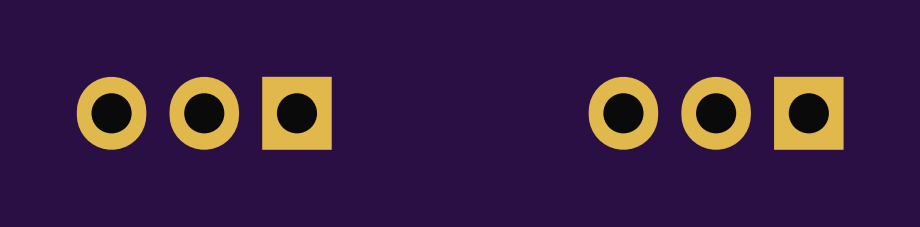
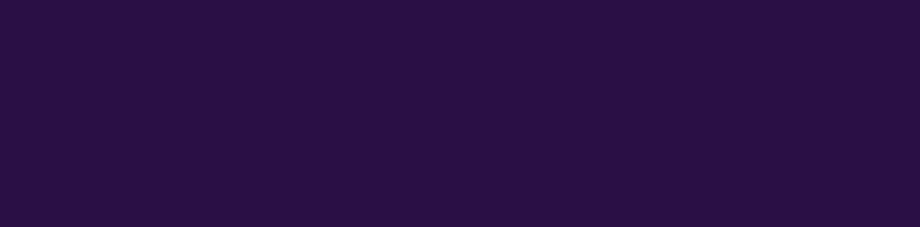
part: (204, 113) -> none
part: (716, 113) -> none

